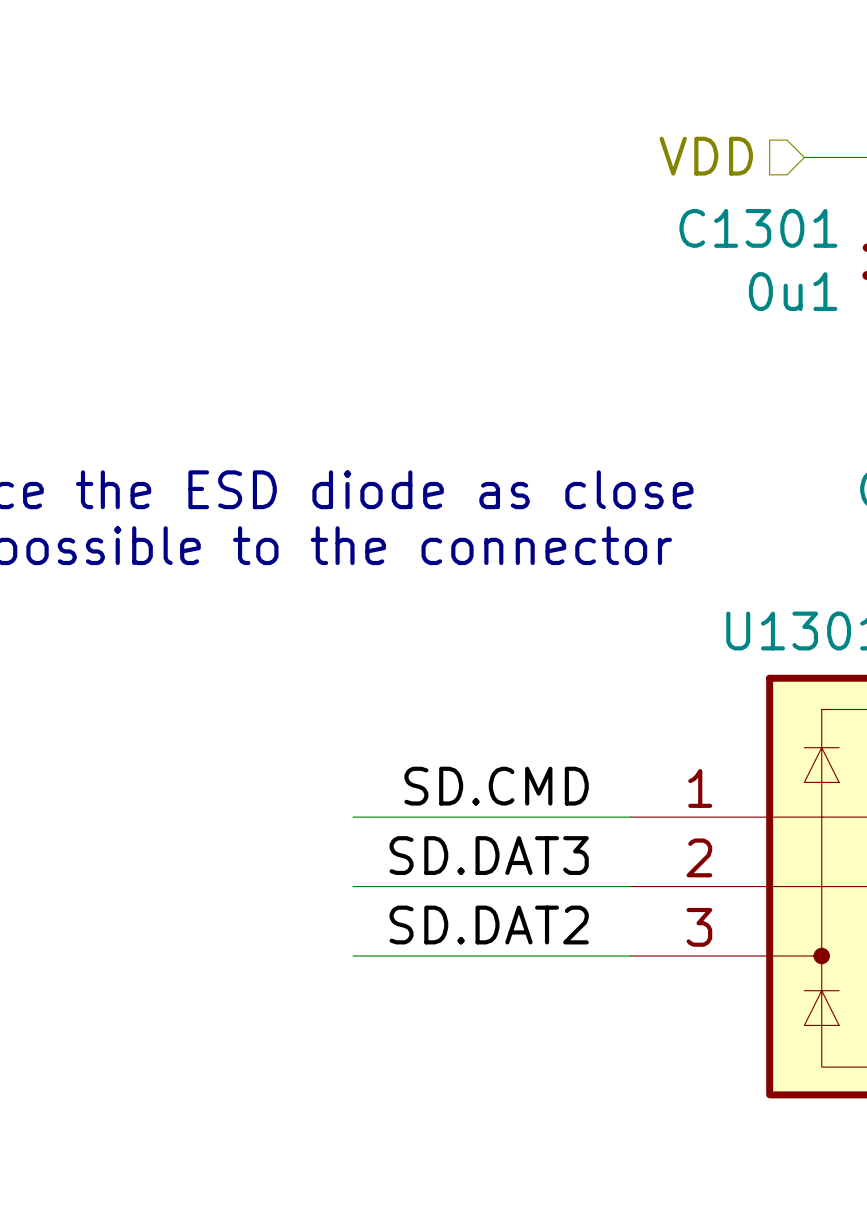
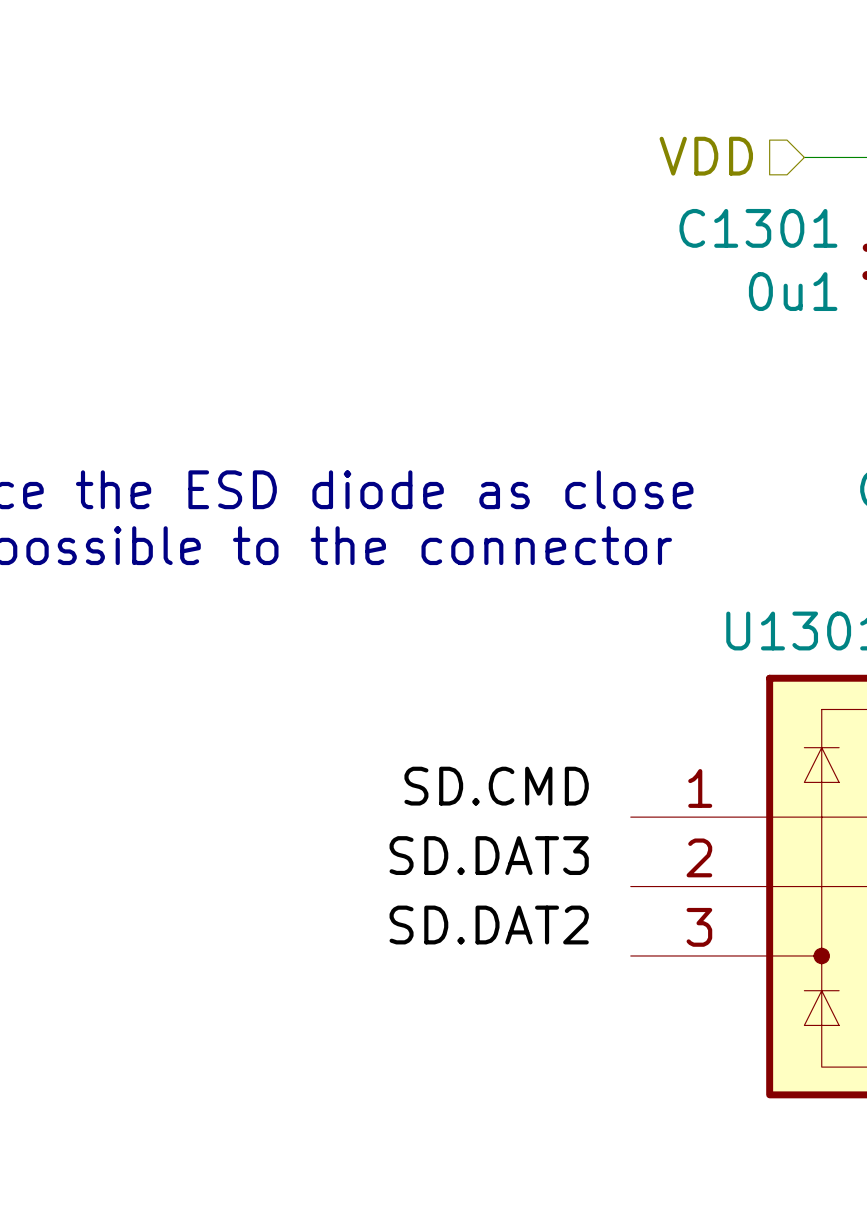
wire: (353, 817) (630, 817) -> none
wire: (353, 886) (630, 886) -> none
wire: (353, 955) (630, 955) -> none

